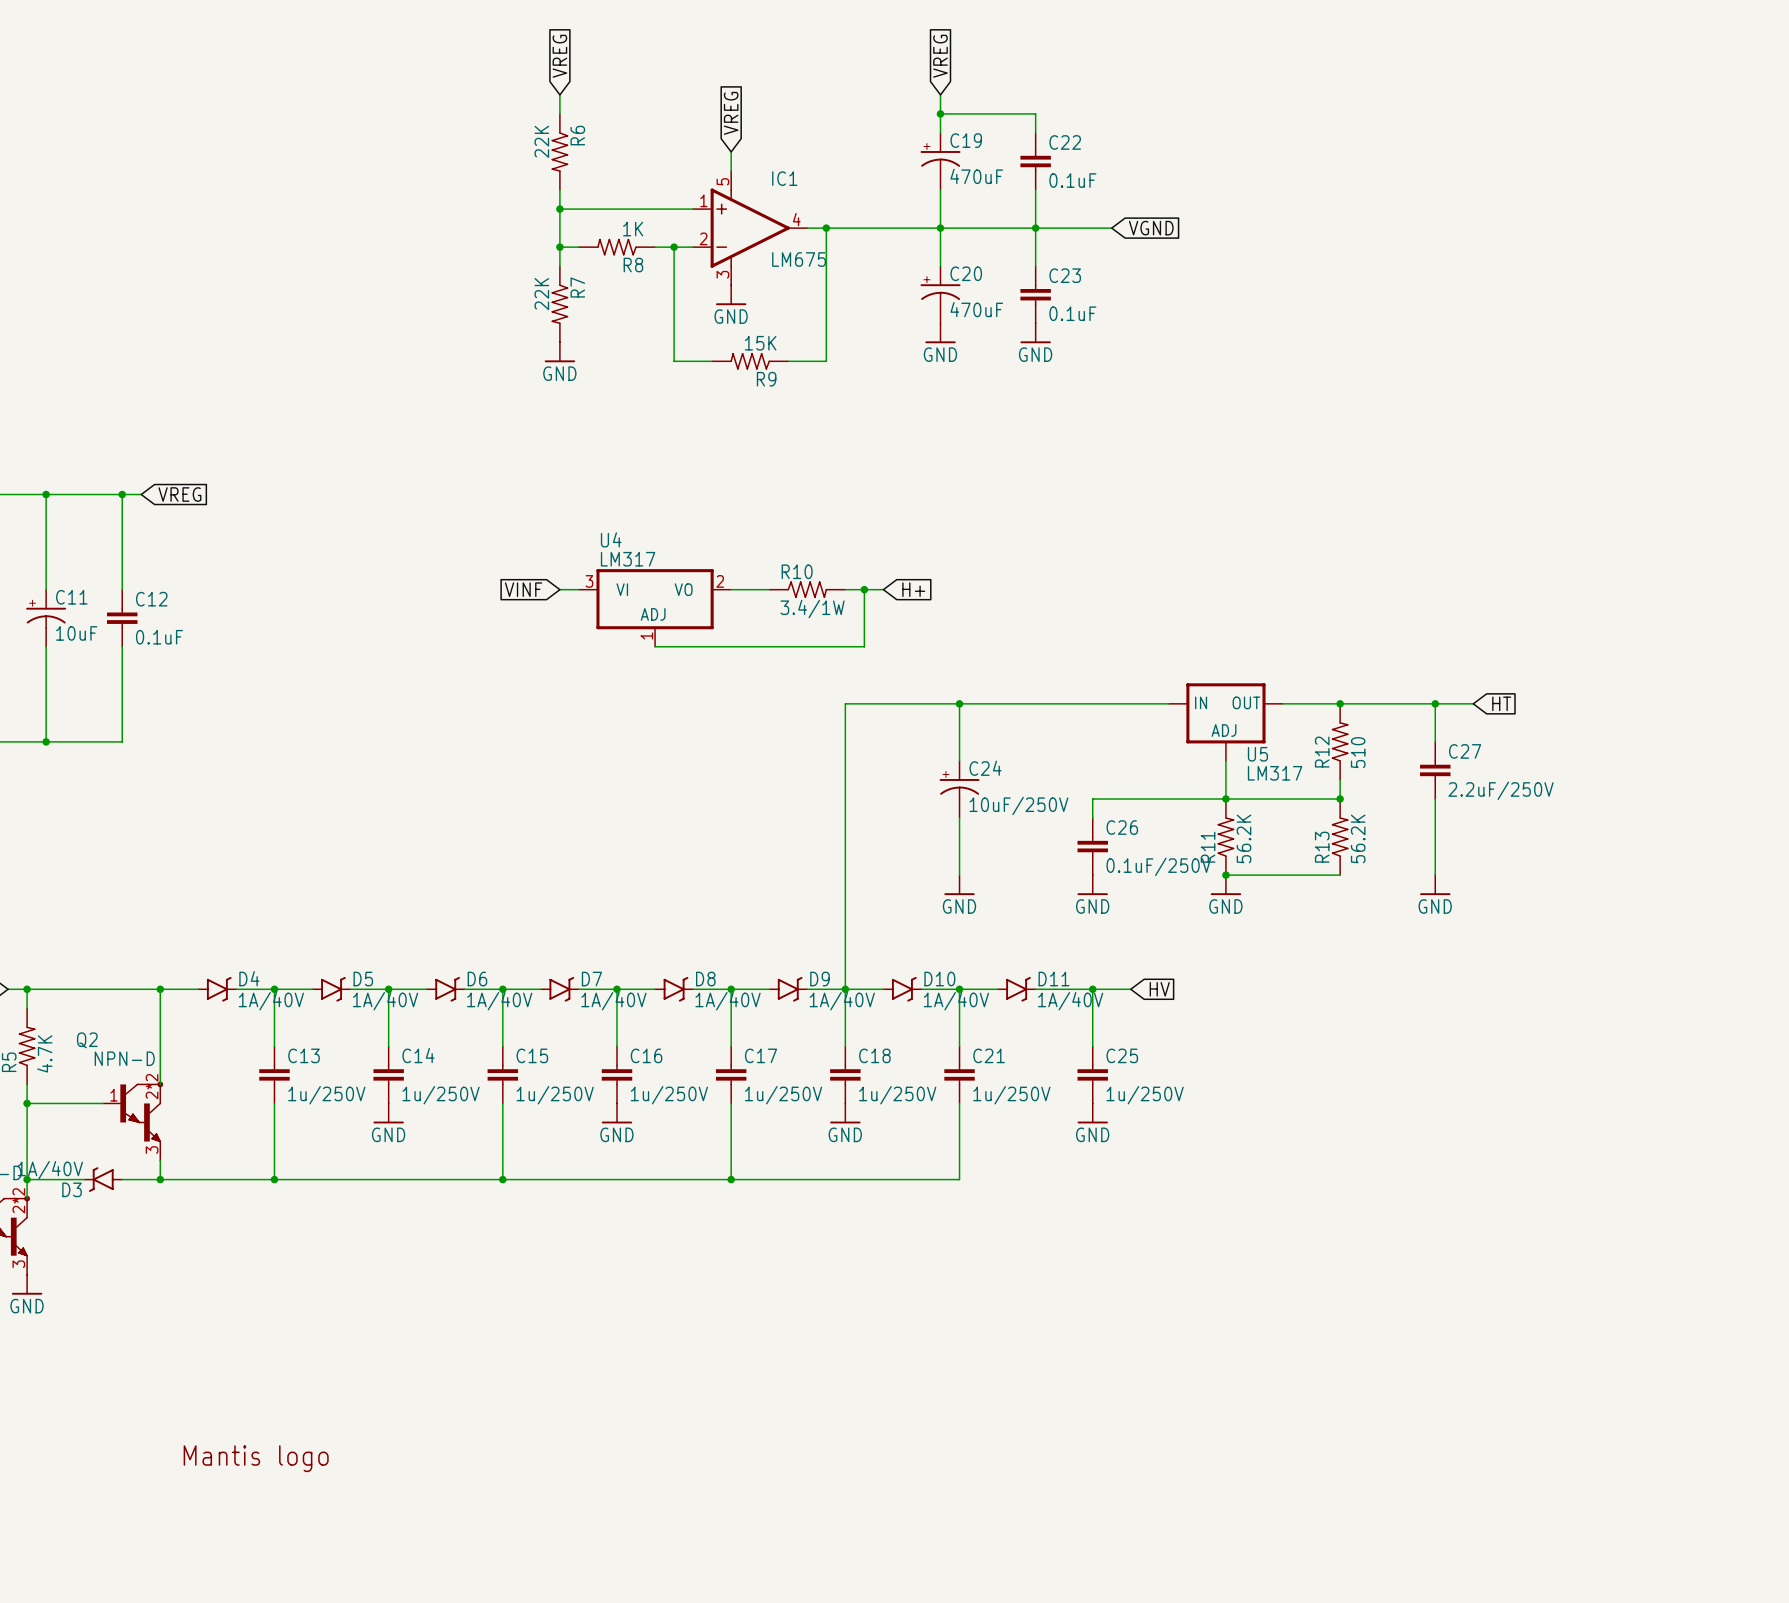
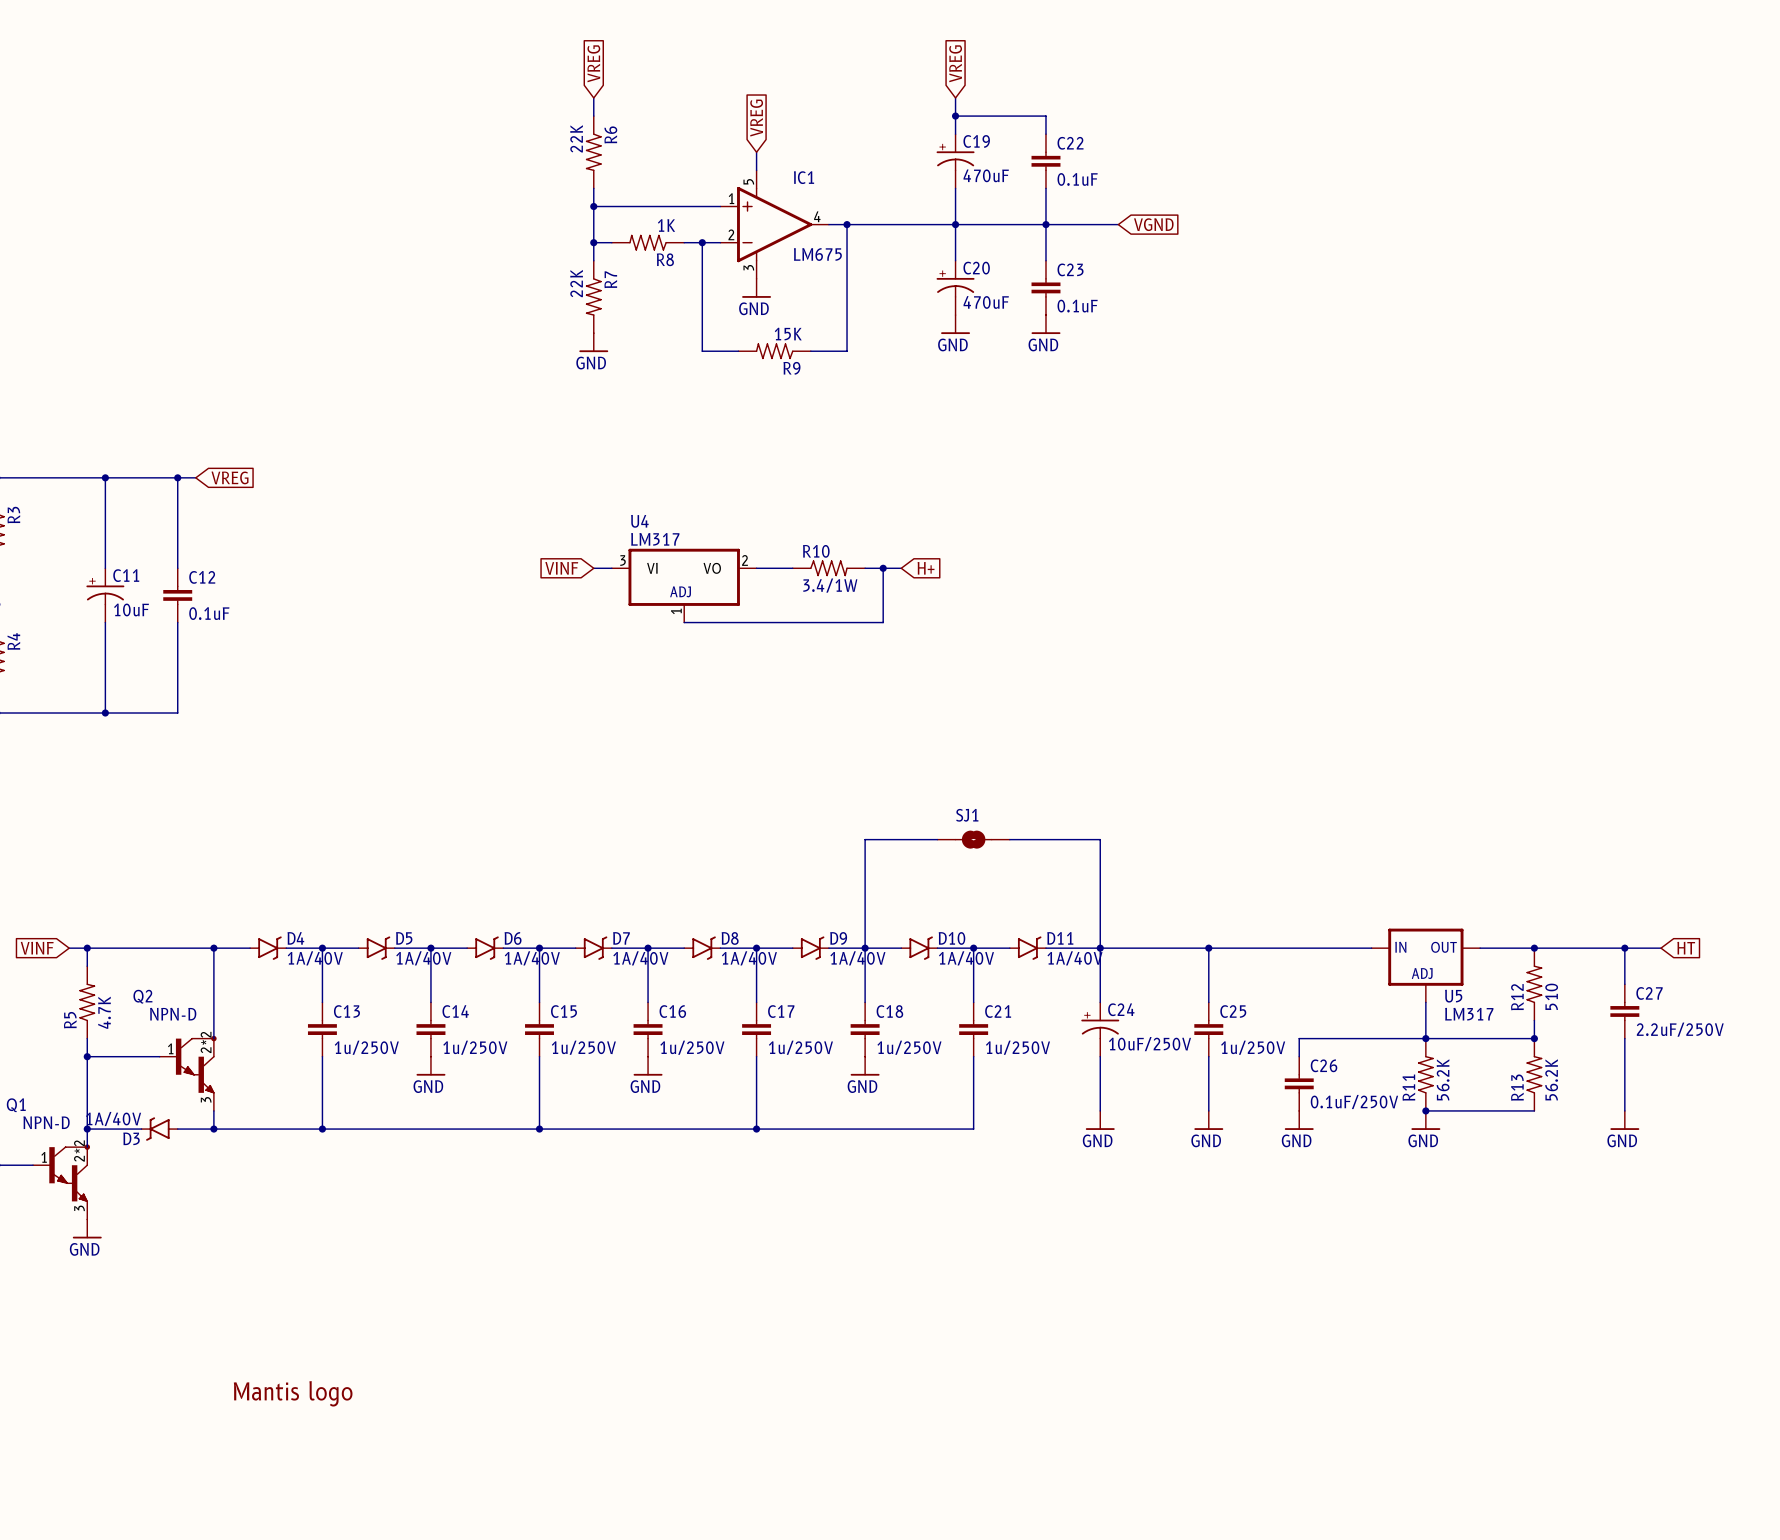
wire: (959, 703) (959, 760) -> none
junction: (959, 703) -> none
wire: (1168, 703) (845, 703) (845, 875) -> (937, 839) (865, 839)
wire: (1283, 703) (1473, 703) -> none
junction: (1340, 703) -> none
wire: (1435, 703) (1435, 741) -> none
junction: (1435, 703) -> none
global label: HT (1501, 703) -> none
U5 position: (1225, 722) -> (1425, 965)
R12 position: (1340, 741) -> (1534, 984)
wire: (1225, 760) (1225, 798) -> none
C27 position: (1435, 770) -> (1624, 1011)
wire: (1340, 779) (1340, 798) (1092, 798) (1092, 818) -> none
C24 position: (959, 789) -> (1100, 1029)
junction: (1225, 798) -> none
junction: (1340, 798) -> none
wire: (1435, 798) (1435, 875) -> none
wire: (959, 818) (959, 875) -> none
R11 position: (1225, 837) -> (1425, 1074)
R13 position: (1340, 837) -> (1534, 1074)
C26 position: (1092, 846) -> (1299, 1083)
SJ1: none -> (973, 839)
wire: none -> (1009, 839) (1100, 839) (1100, 948)
wire: (1225, 875) (1340, 875) -> none
junction: (1225, 875) -> none
power symbol: GND (959, 885) -> none
power symbol: GND (1092, 885) -> none
power symbol: GND (1225, 885) -> none
power symbol: GND (1435, 885) -> none
wire: none -> (1136, 948) (1371, 948)
global label: HV (1159, 989) -> none
wire: none -> (1208, 948) (1208, 1002)
junction: none -> (1208, 948)
wire: none -> (1480, 948) (1661, 948)
junction: none -> (1534, 948)
wire: none -> (1624, 948) (1624, 984)
junction: none -> (1624, 948)
global label: none -> HT (1686, 948)
wire: none -> (1425, 1002) (1425, 1038)
wire: none -> (1534, 1020) (1534, 1038) (1299, 1038) (1299, 1056)
C25 position: (1092, 1074) -> (1208, 1029)
junction: none -> (1425, 1038)
junction: none -> (1534, 1038)
wire: none -> (1624, 1038) (1624, 1110)
wire: none -> (1100, 1056) (1100, 1110)
wire: none -> (1208, 1056) (1208, 1110)
power symbol position: GND (1092, 1113) -> GND (1100, 1120)
wire: none -> (1425, 1110) (1534, 1110)
junction: none -> (1425, 1110)
power symbol: none -> GND (1208, 1120)
power symbol: none -> GND (1299, 1120)
power symbol: none -> GND (1425, 1120)
power symbol: none -> GND (1624, 1120)

